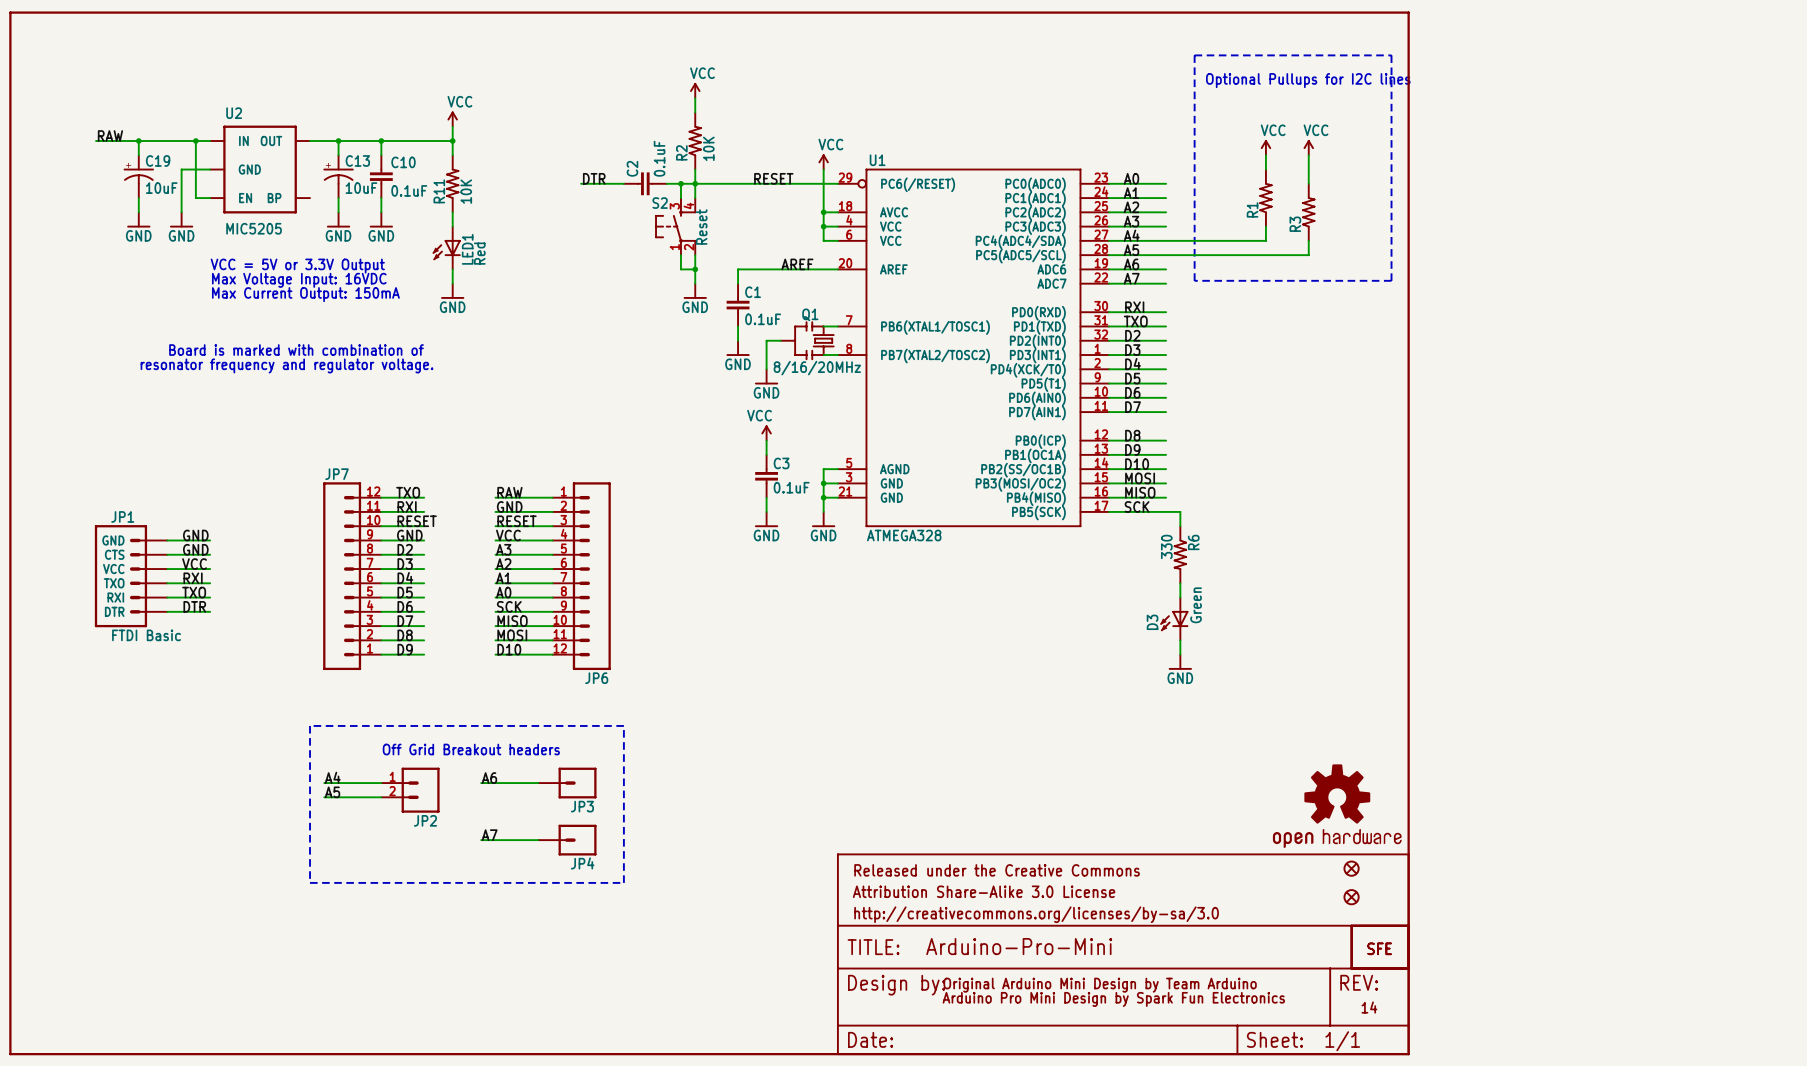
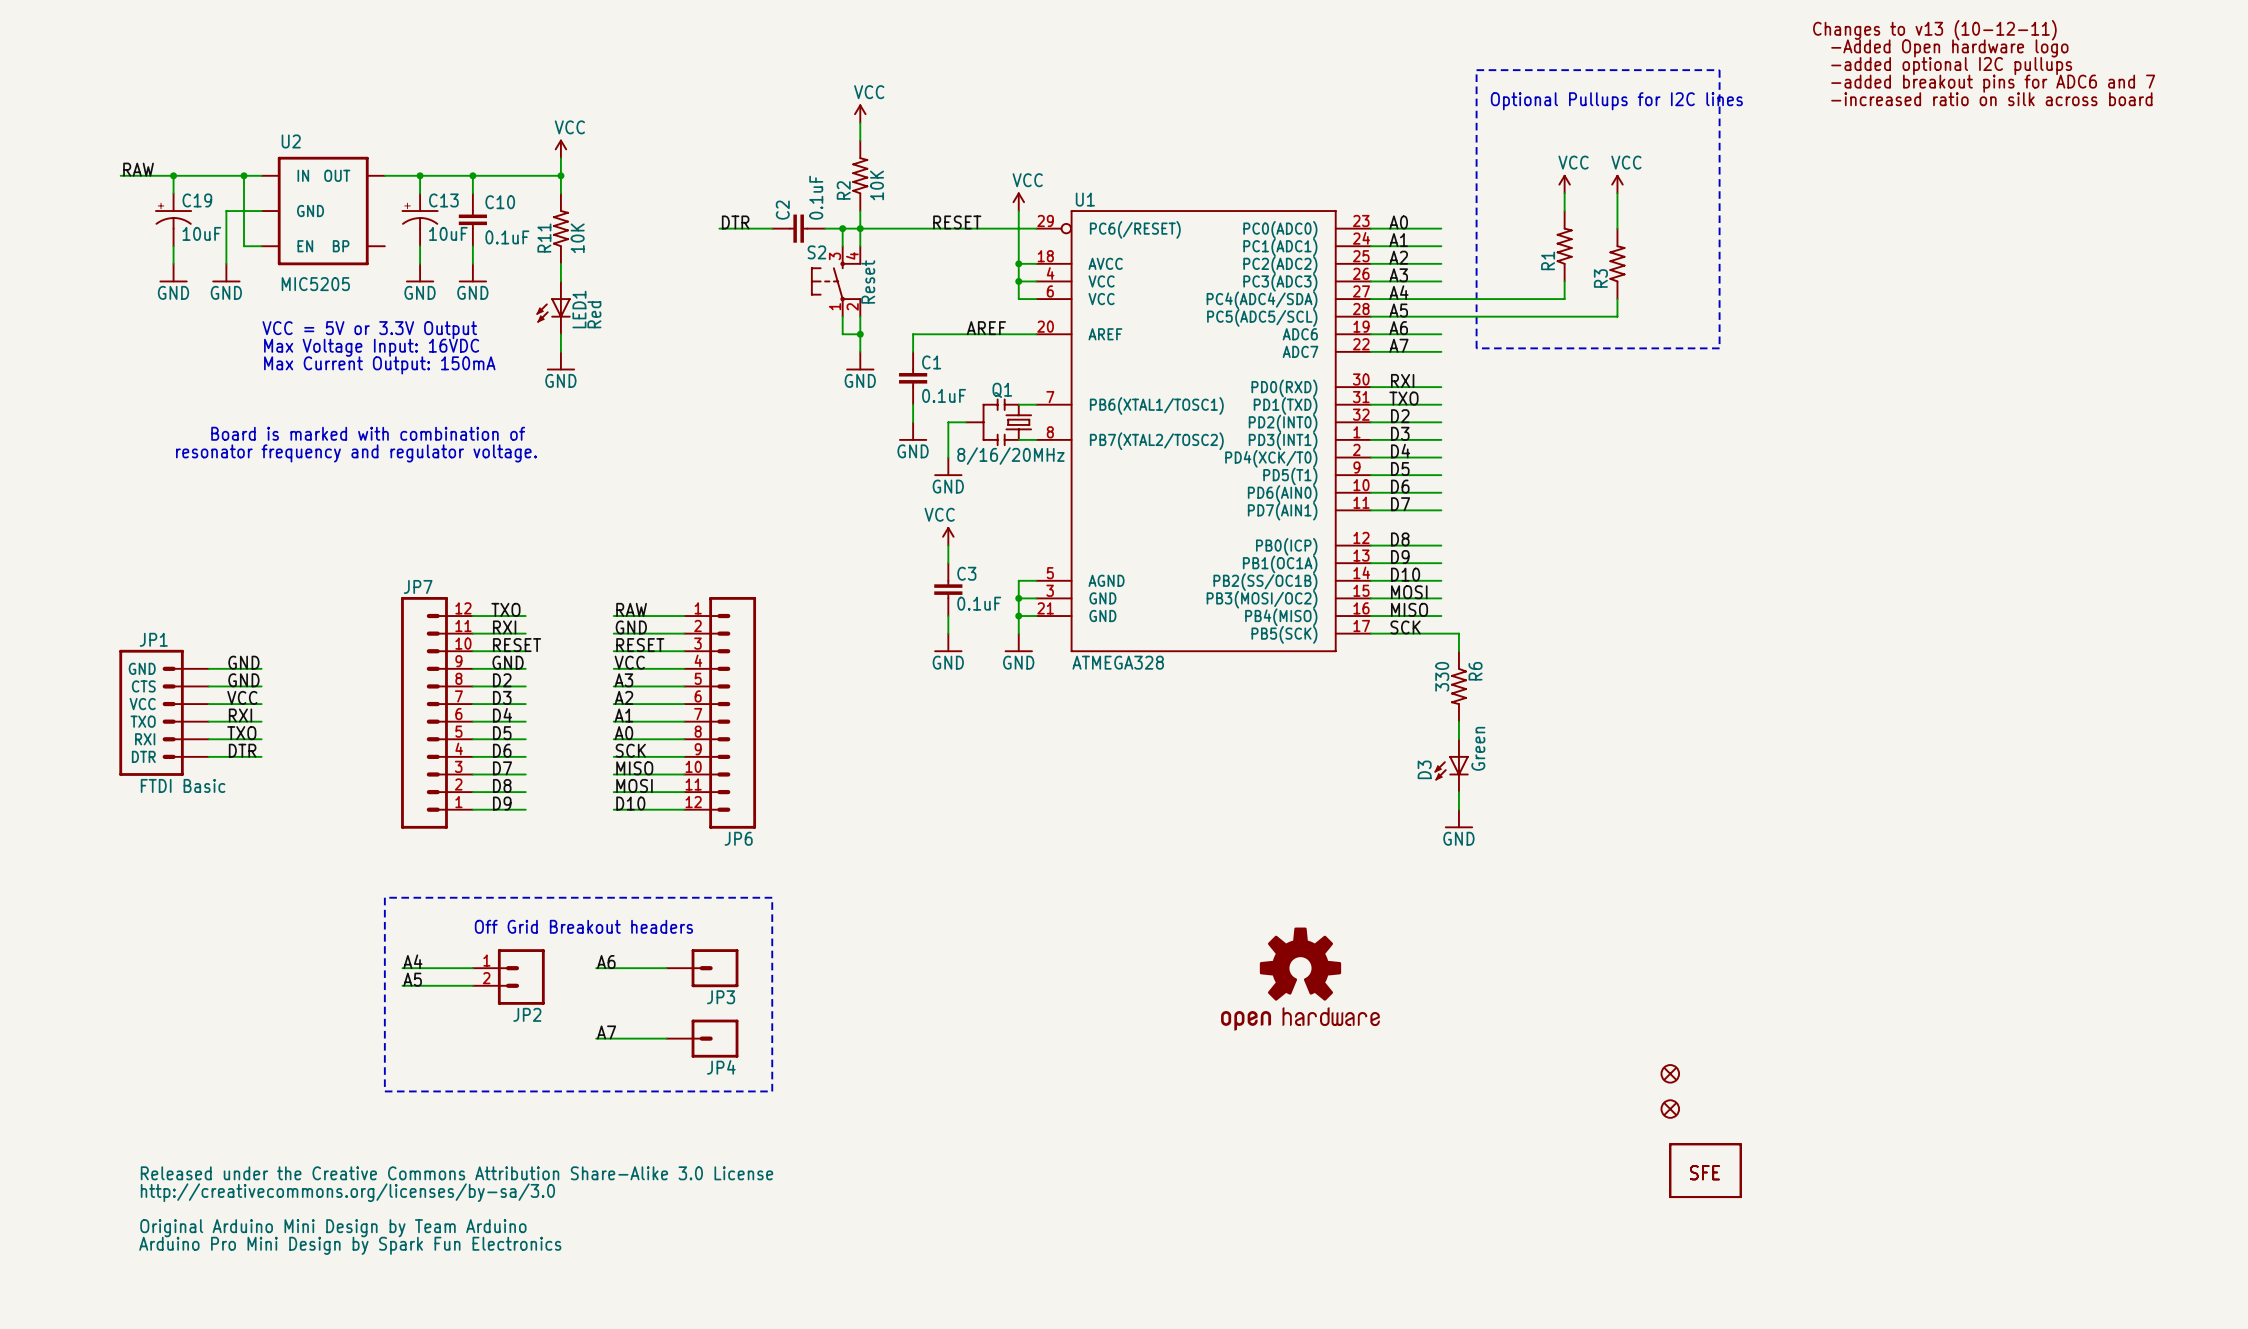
text: none -> Changes to v13 (10-12-11) (1934, 30)
text: none -> -Added Open hardware logo (1949, 48)
text: none -> -added optional I2C pullups (1951, 66)
text: none -> -added breakout pins for ADC6 and 7 (1993, 83)
text: none -> -increased ratio on silk across board (1991, 99)
part: (709, 533) -> none
part: none -> (1300, 979)
part: (1337, 806) -> none
text: none -> Released under the Creative Commons Attribution Share-Alike 3.0 License (456, 1173)
part: (1123, 954) -> none
text: none -> http://creativecommons.org/licenses/by-sa/3.0 (347, 1192)
text: Original Arduino Mini Design by Team Arduino (1100, 985) -> none
text: none -> Original Arduino Mini Design by Team Arduino (333, 1228)
text: Arduino Pro Mini Design by Spark Fun Electronics (1113, 999) -> none
text: 14 (1369, 1007) -> none
text: none -> Arduino Pro Mini Design by Spark Fun Electronics (350, 1245)

